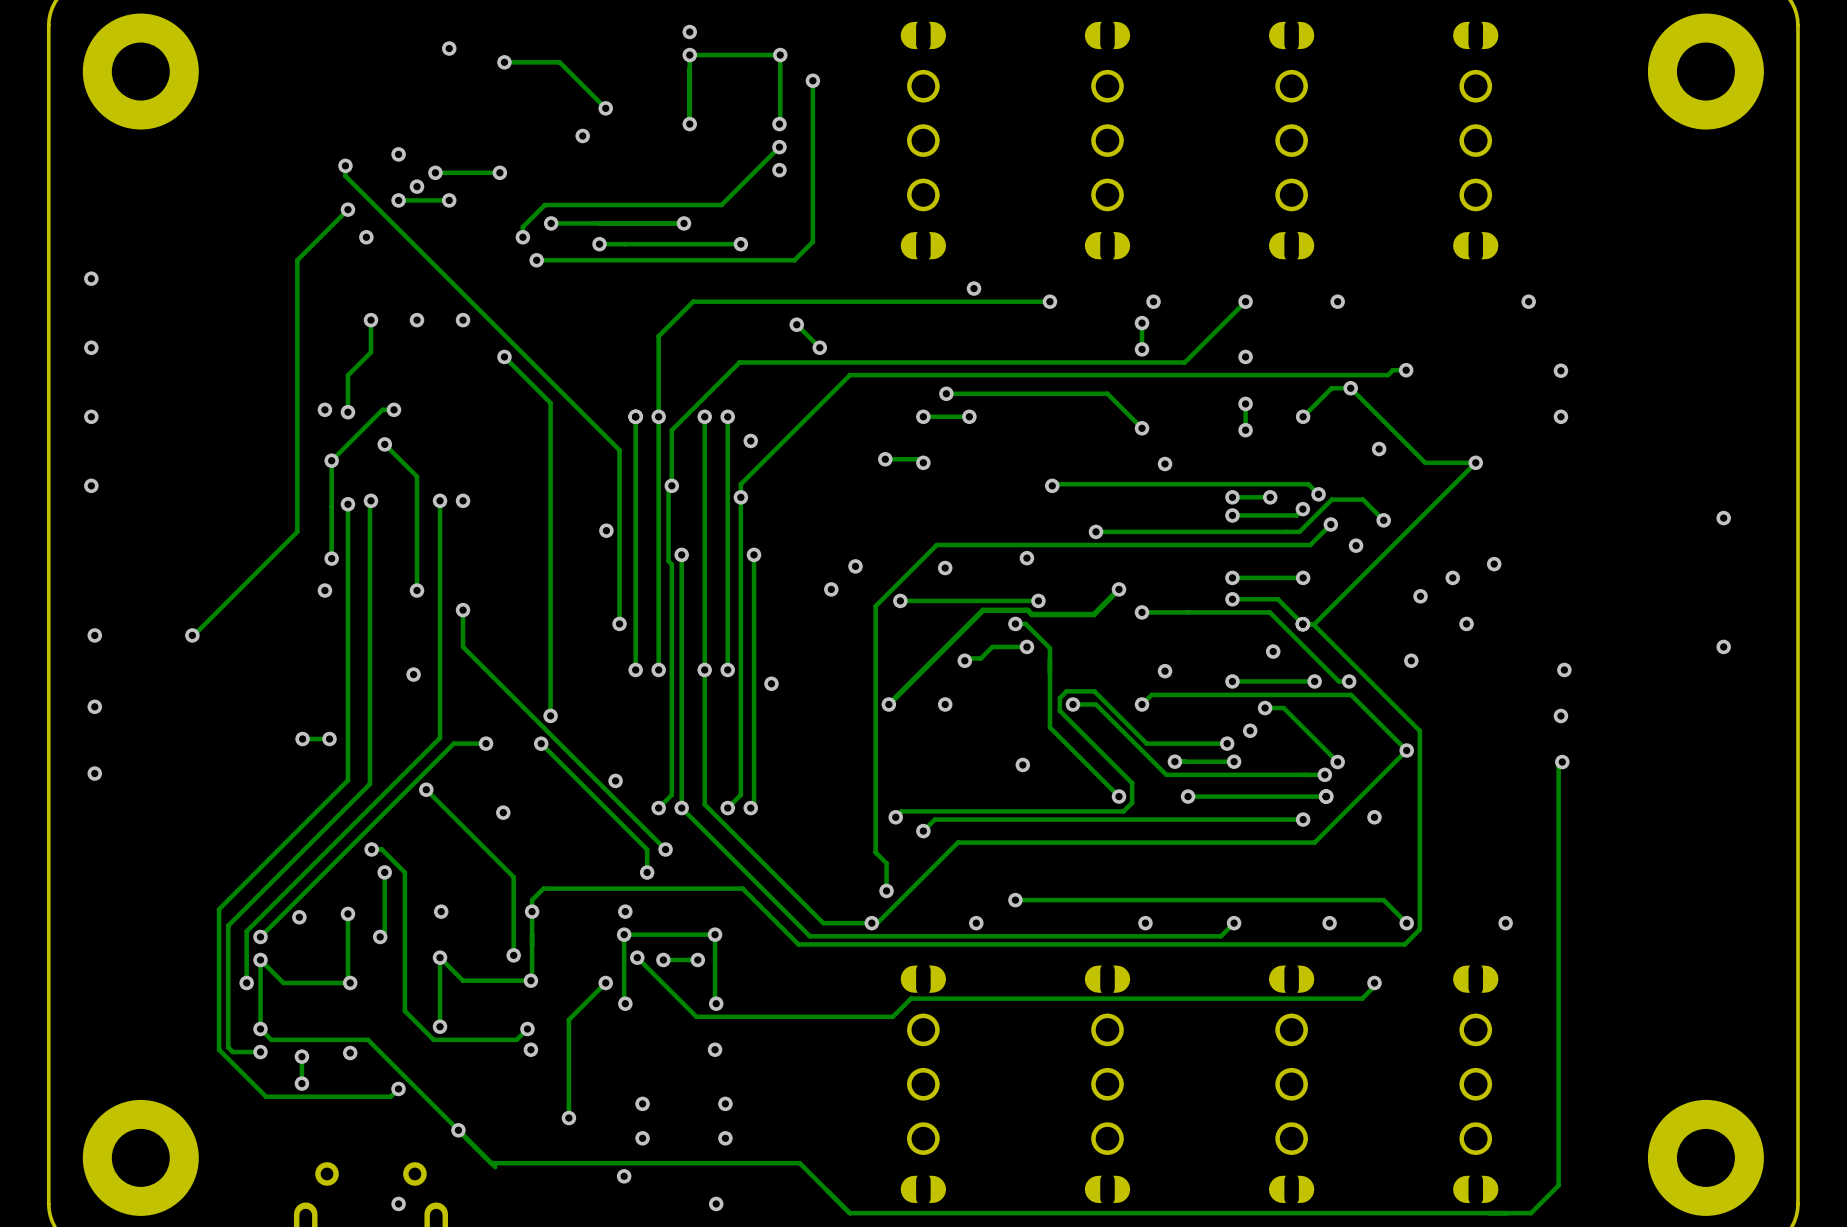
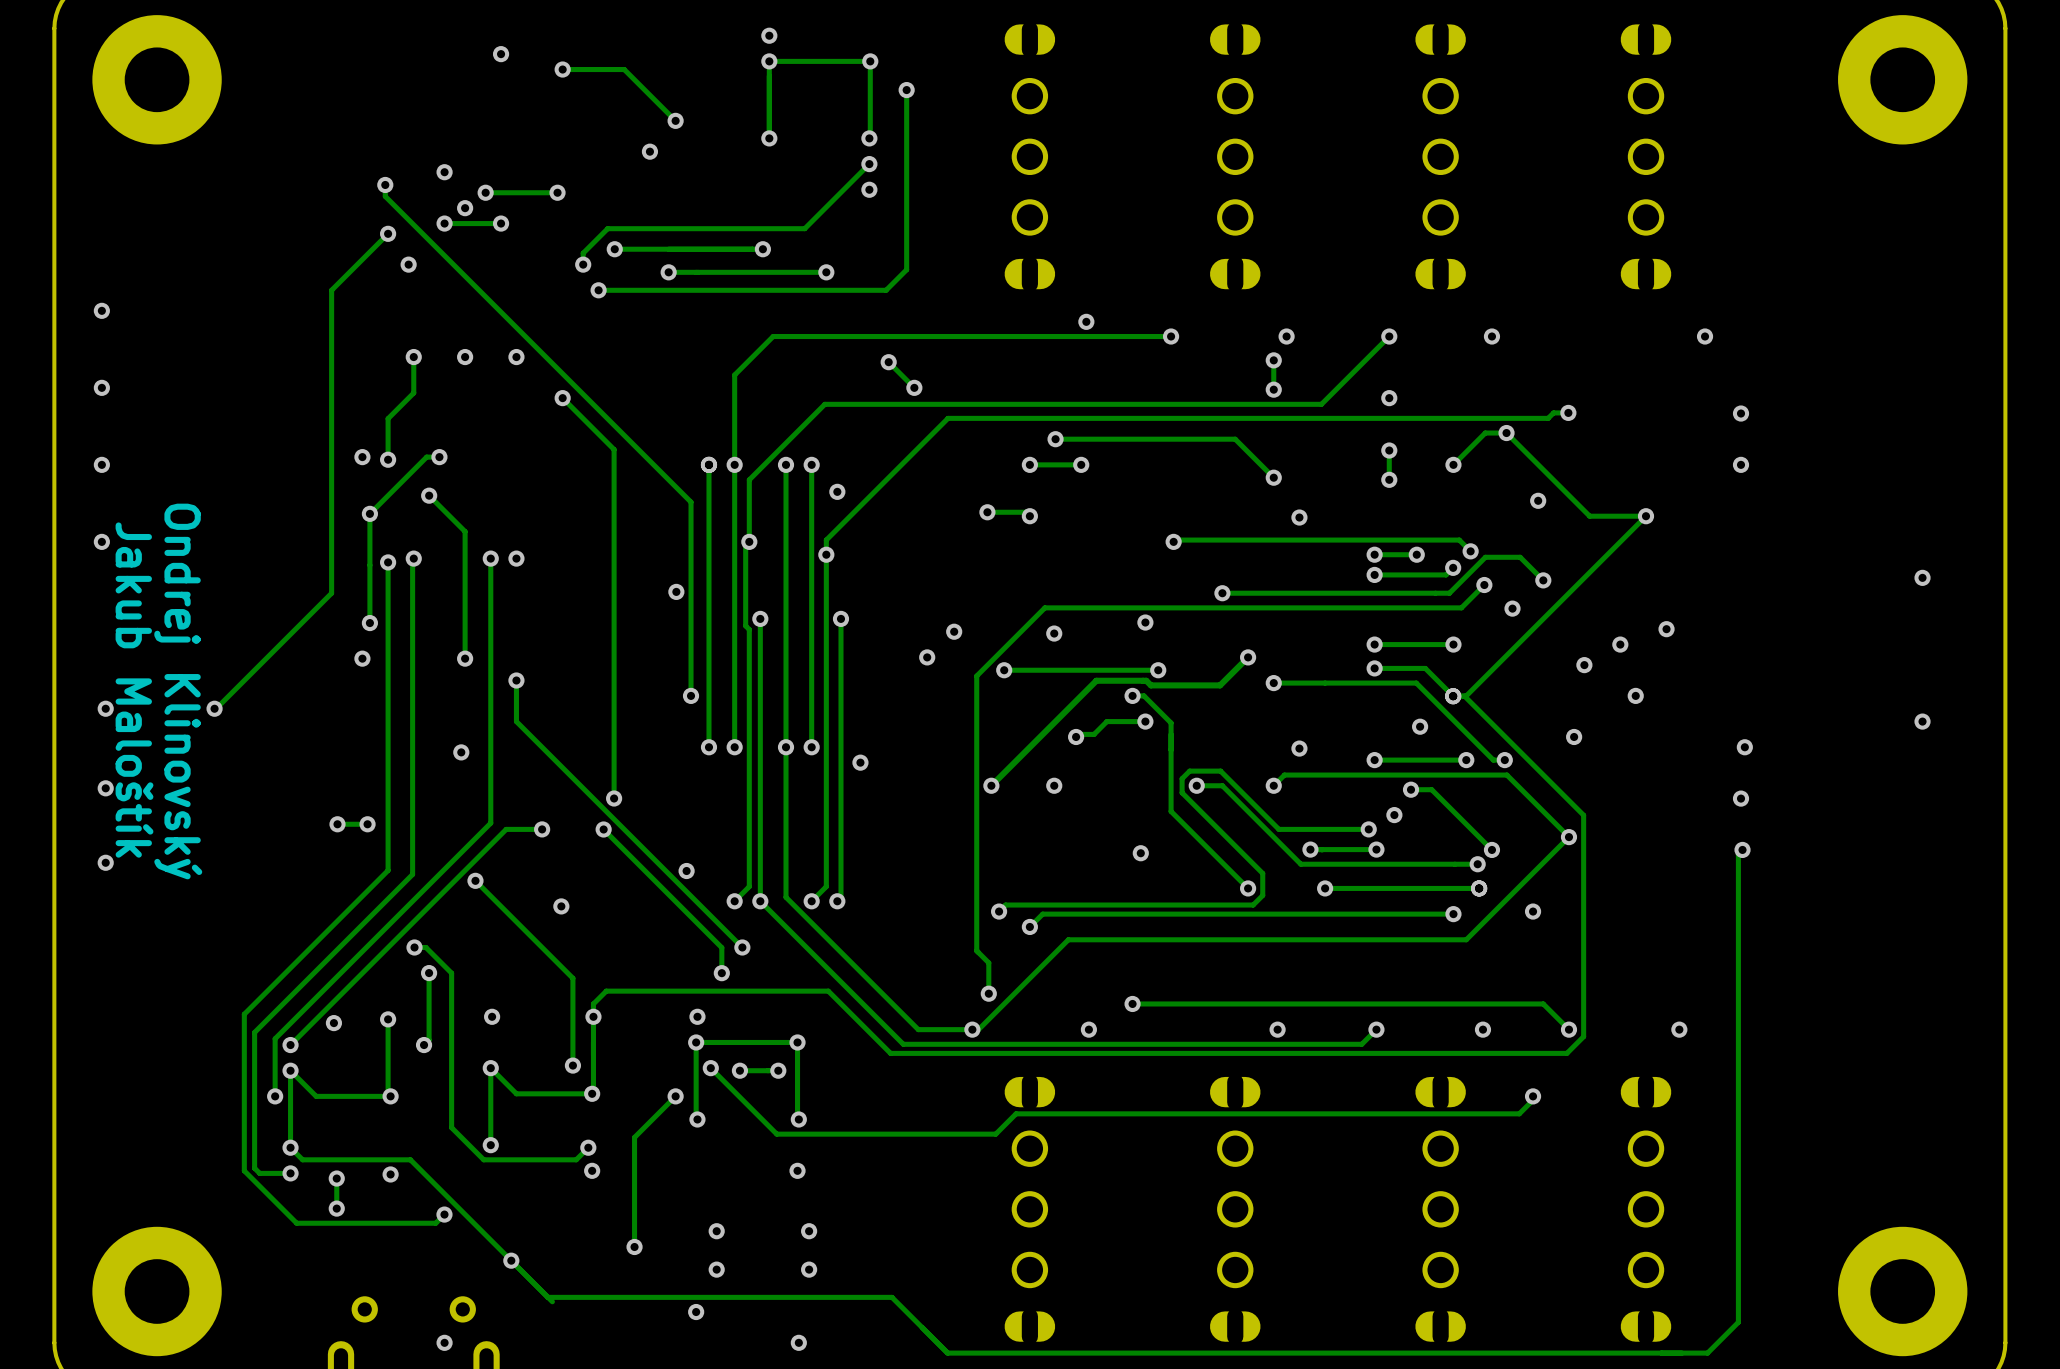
text: none -> Jakub Maloštík (134, 690)
text: none -> Ondrej Klinovský (178, 691)

